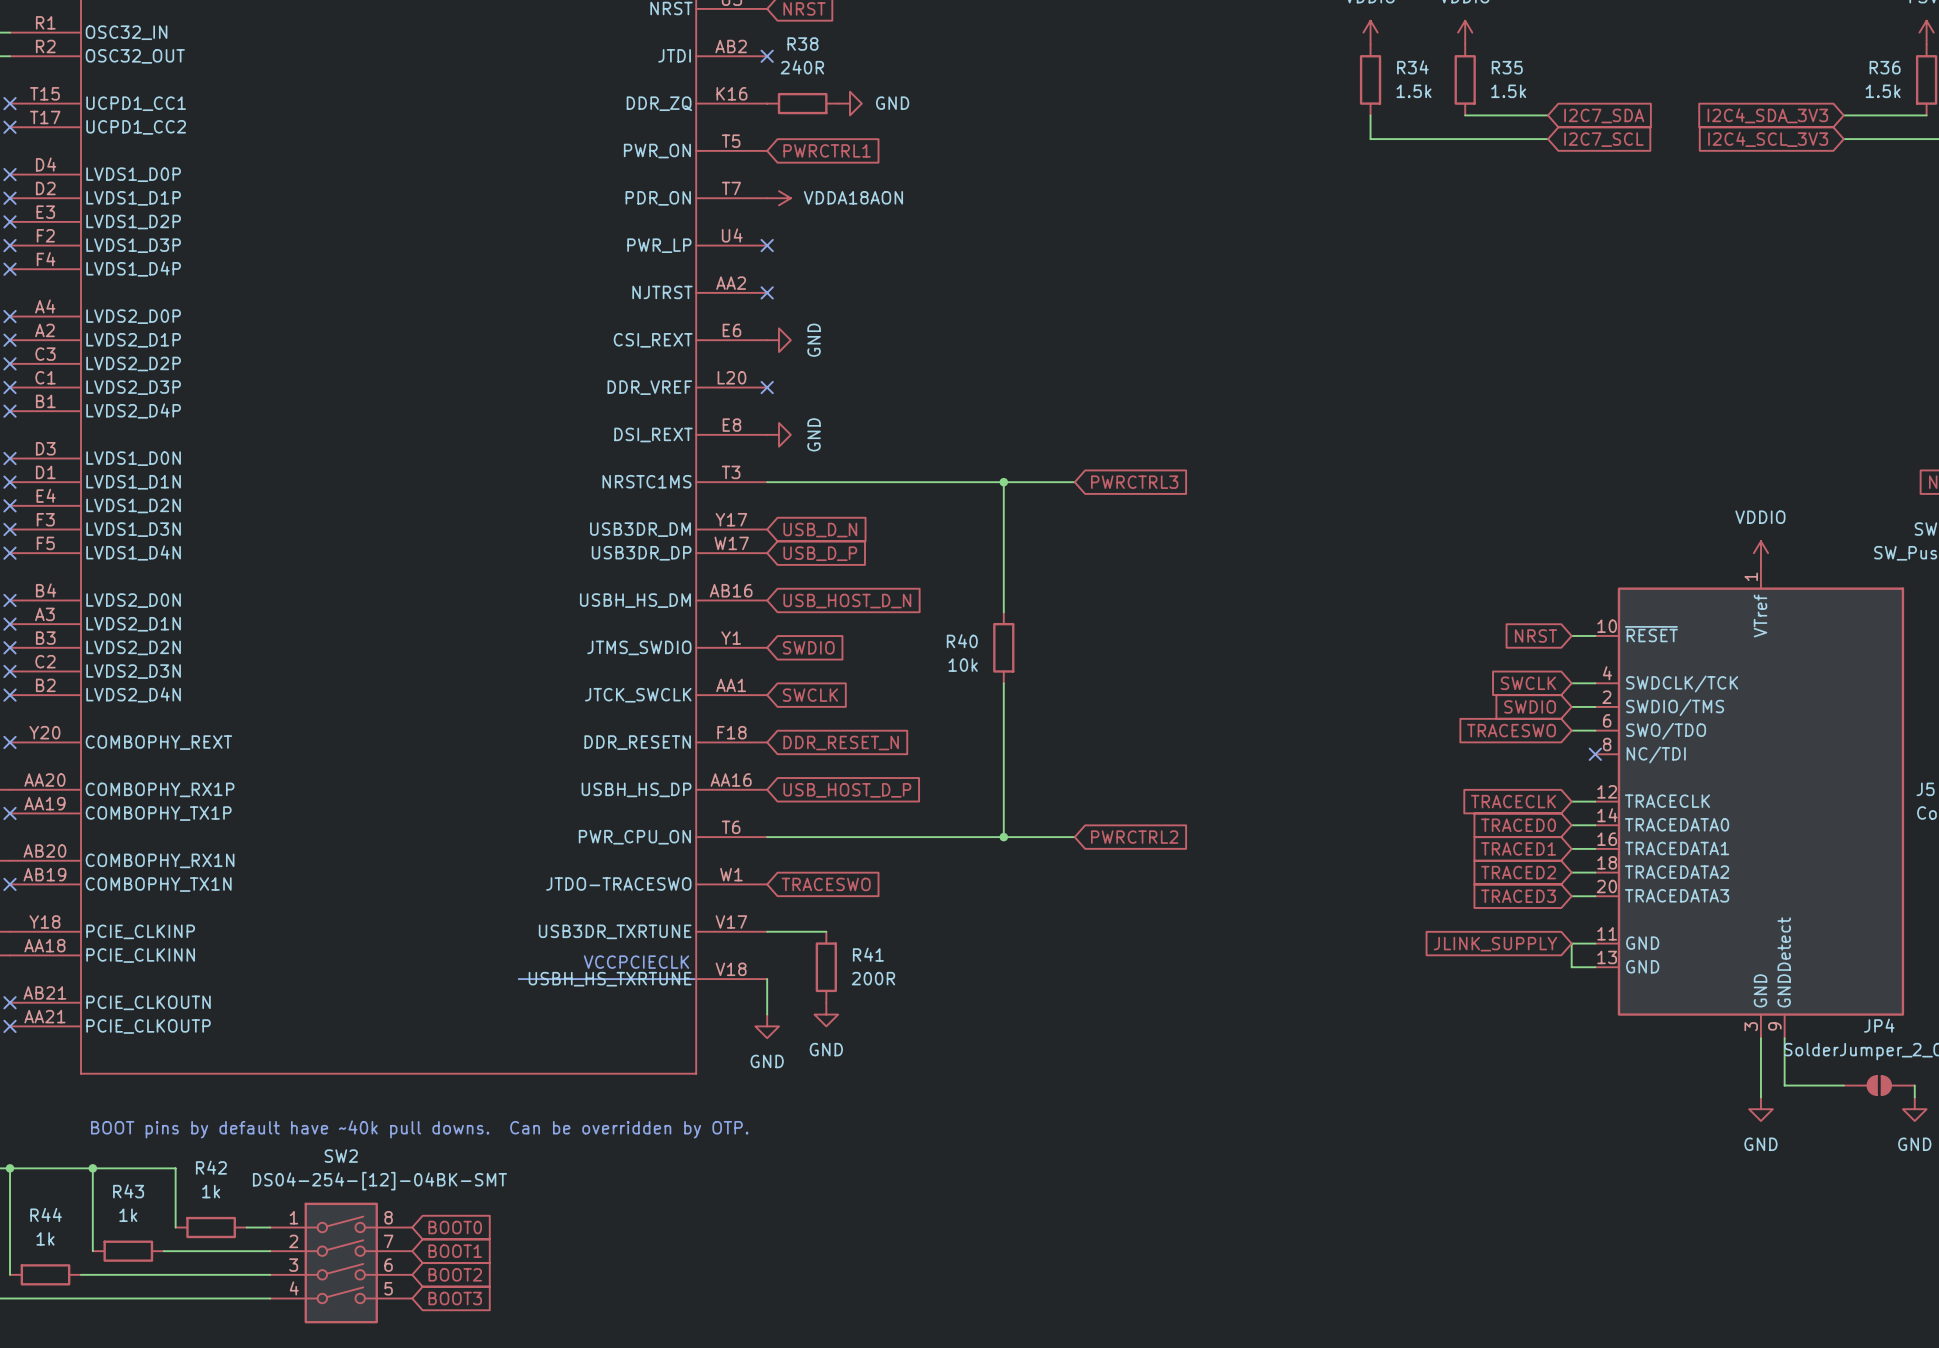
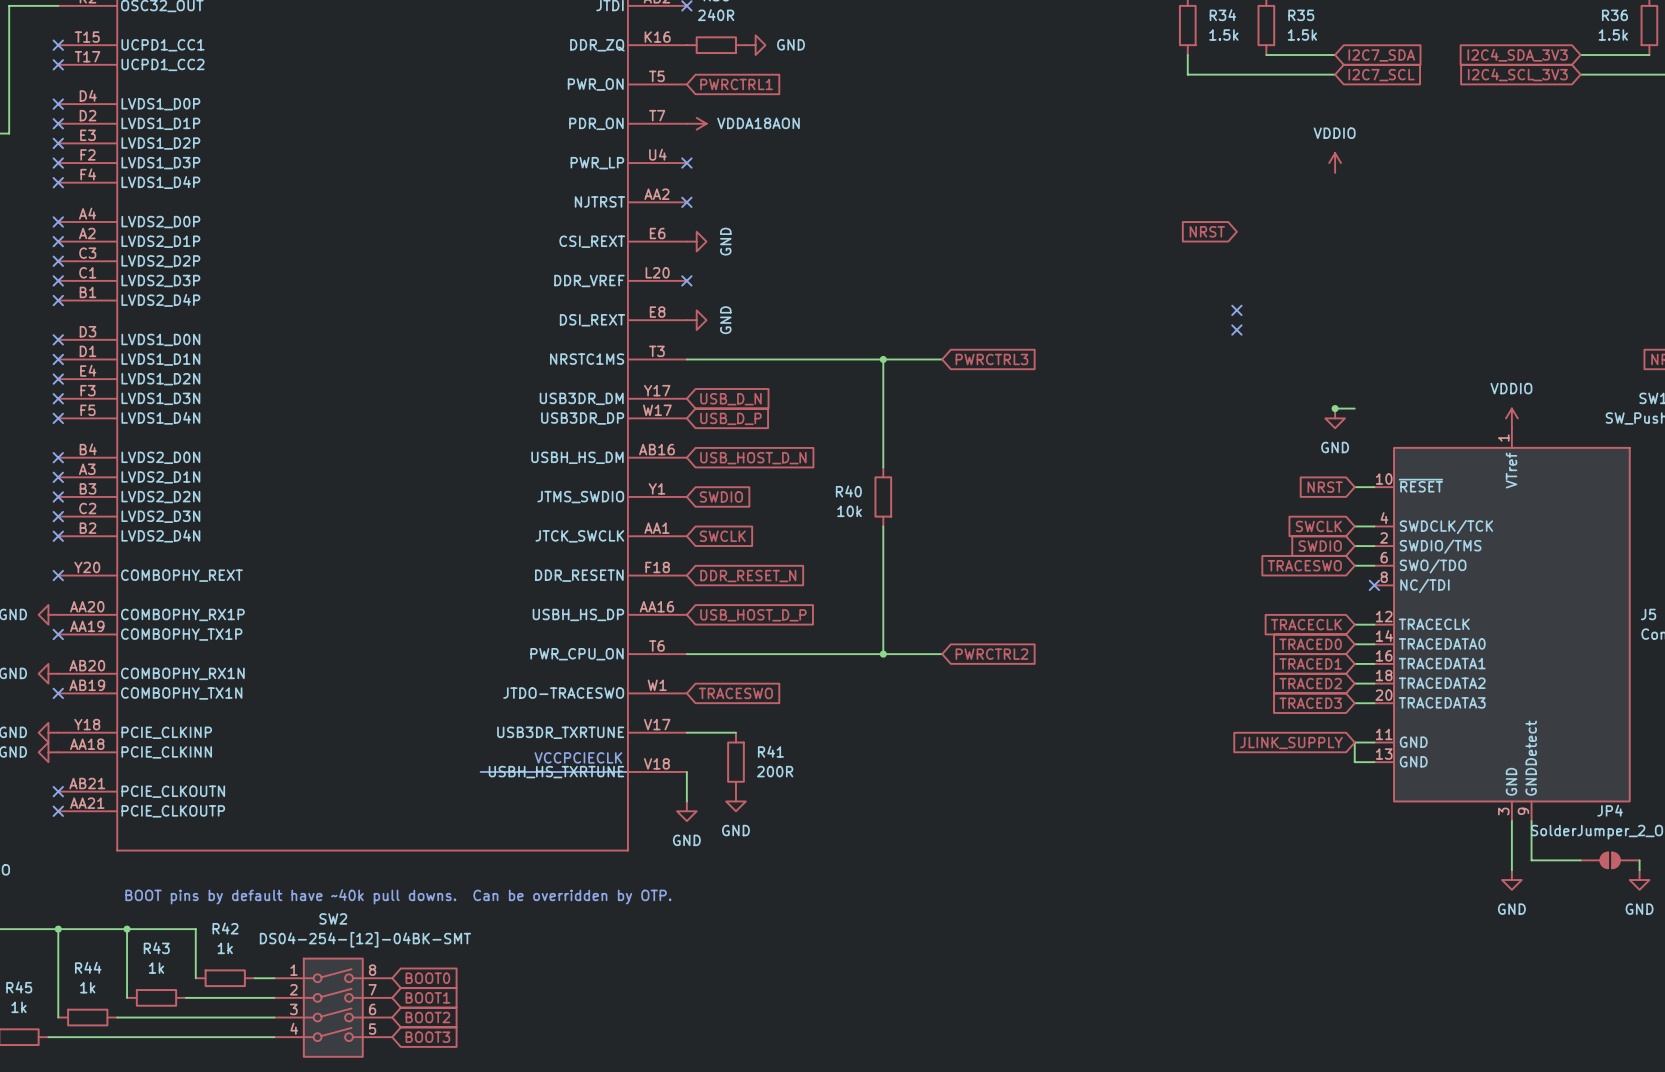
power symbol: none -> VDDIO (1335, 163)
global label: none -> NRST (1207, 231)
no-connect mark: none -> (1236, 310)
no-connect mark: none -> (1236, 330)
wire: none -> (1335, 408) (1354, 408)
junction: none -> (1335, 408)
power symbol: none -> GND (1335, 418)

